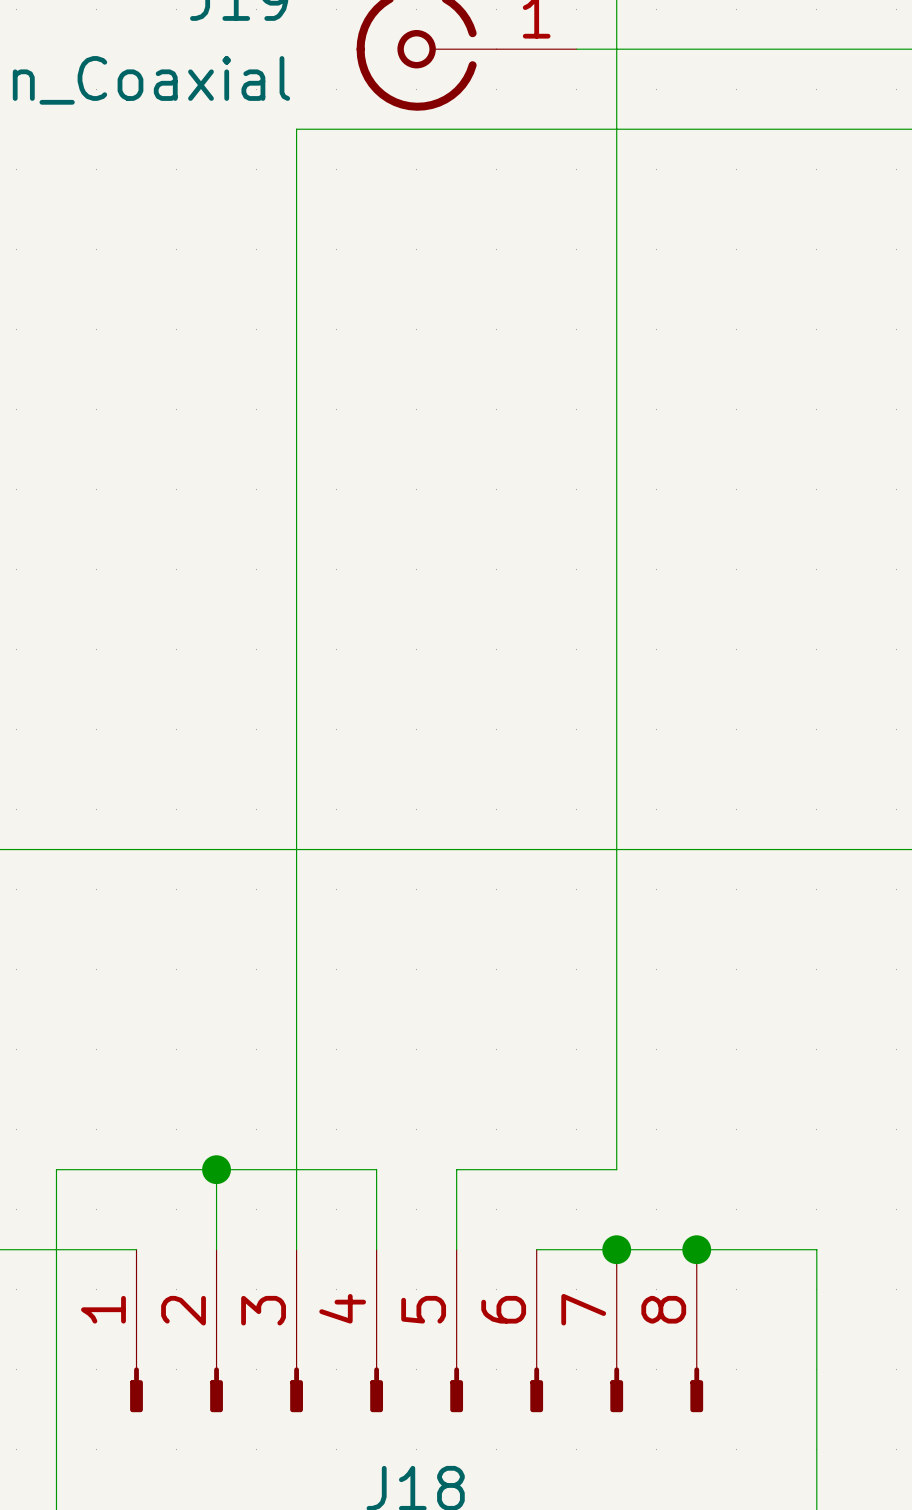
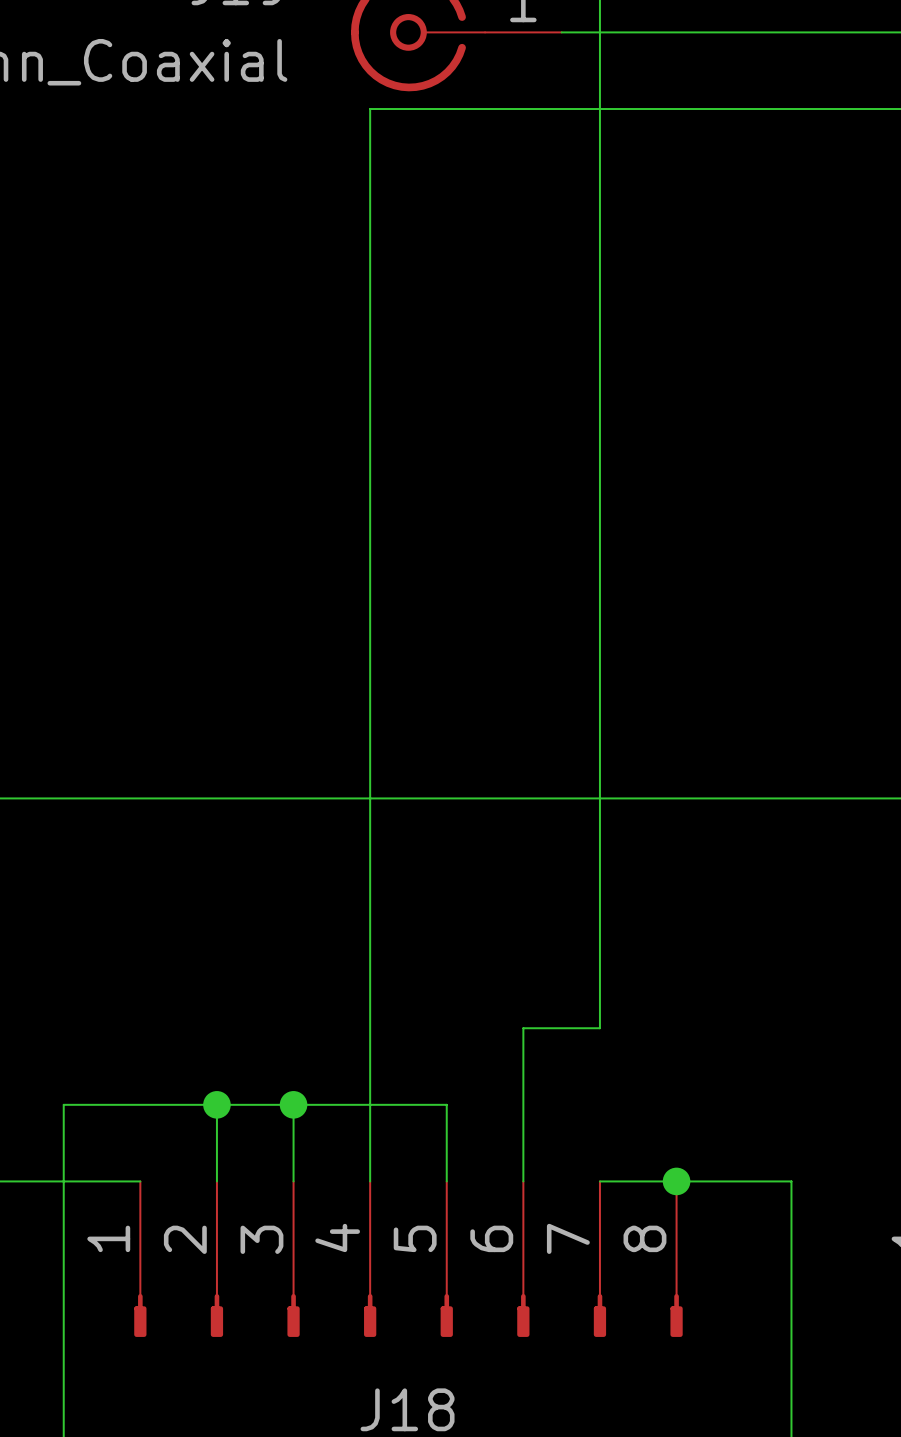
wire: (376, 129) (296, 129) (296, 1169) -> (370, 109) (370, 1104) (446, 1104)
wire: (616, 1089) (616, 1169) (456, 1169) -> (599, 1028) (523, 1028) (523, 1181)
junction: none -> (293, 1104)
wire: (536, 1249) (616, 1249) -> none
junction: (616, 1249) -> none

